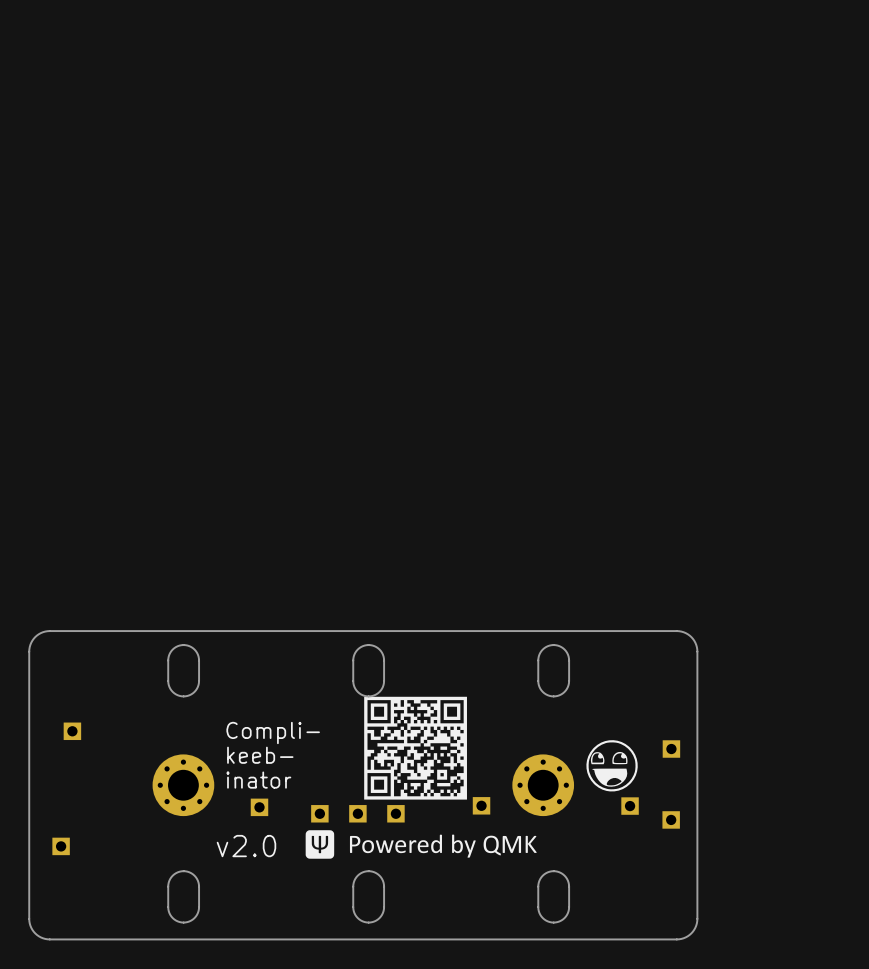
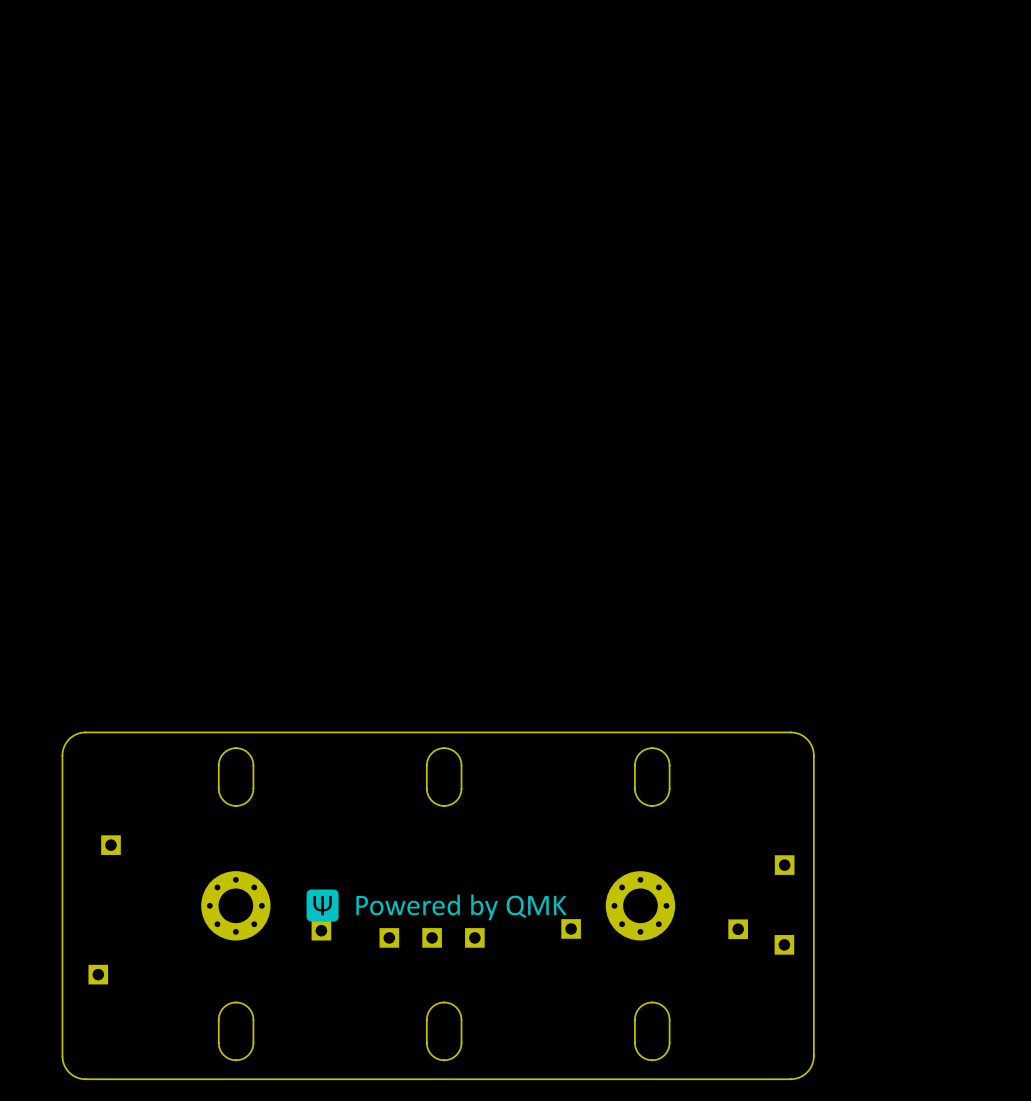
drawing: [364, 696, 467, 800] -> none
text: Compli- (273, 732) -> none
drawing: [586, 740, 638, 792] -> none
text: keeb- (260, 755) -> none
text: inator (258, 780) -> none
drawing position: (421, 844) -> (436, 905)
text: v2.0 (246, 846) -> none

